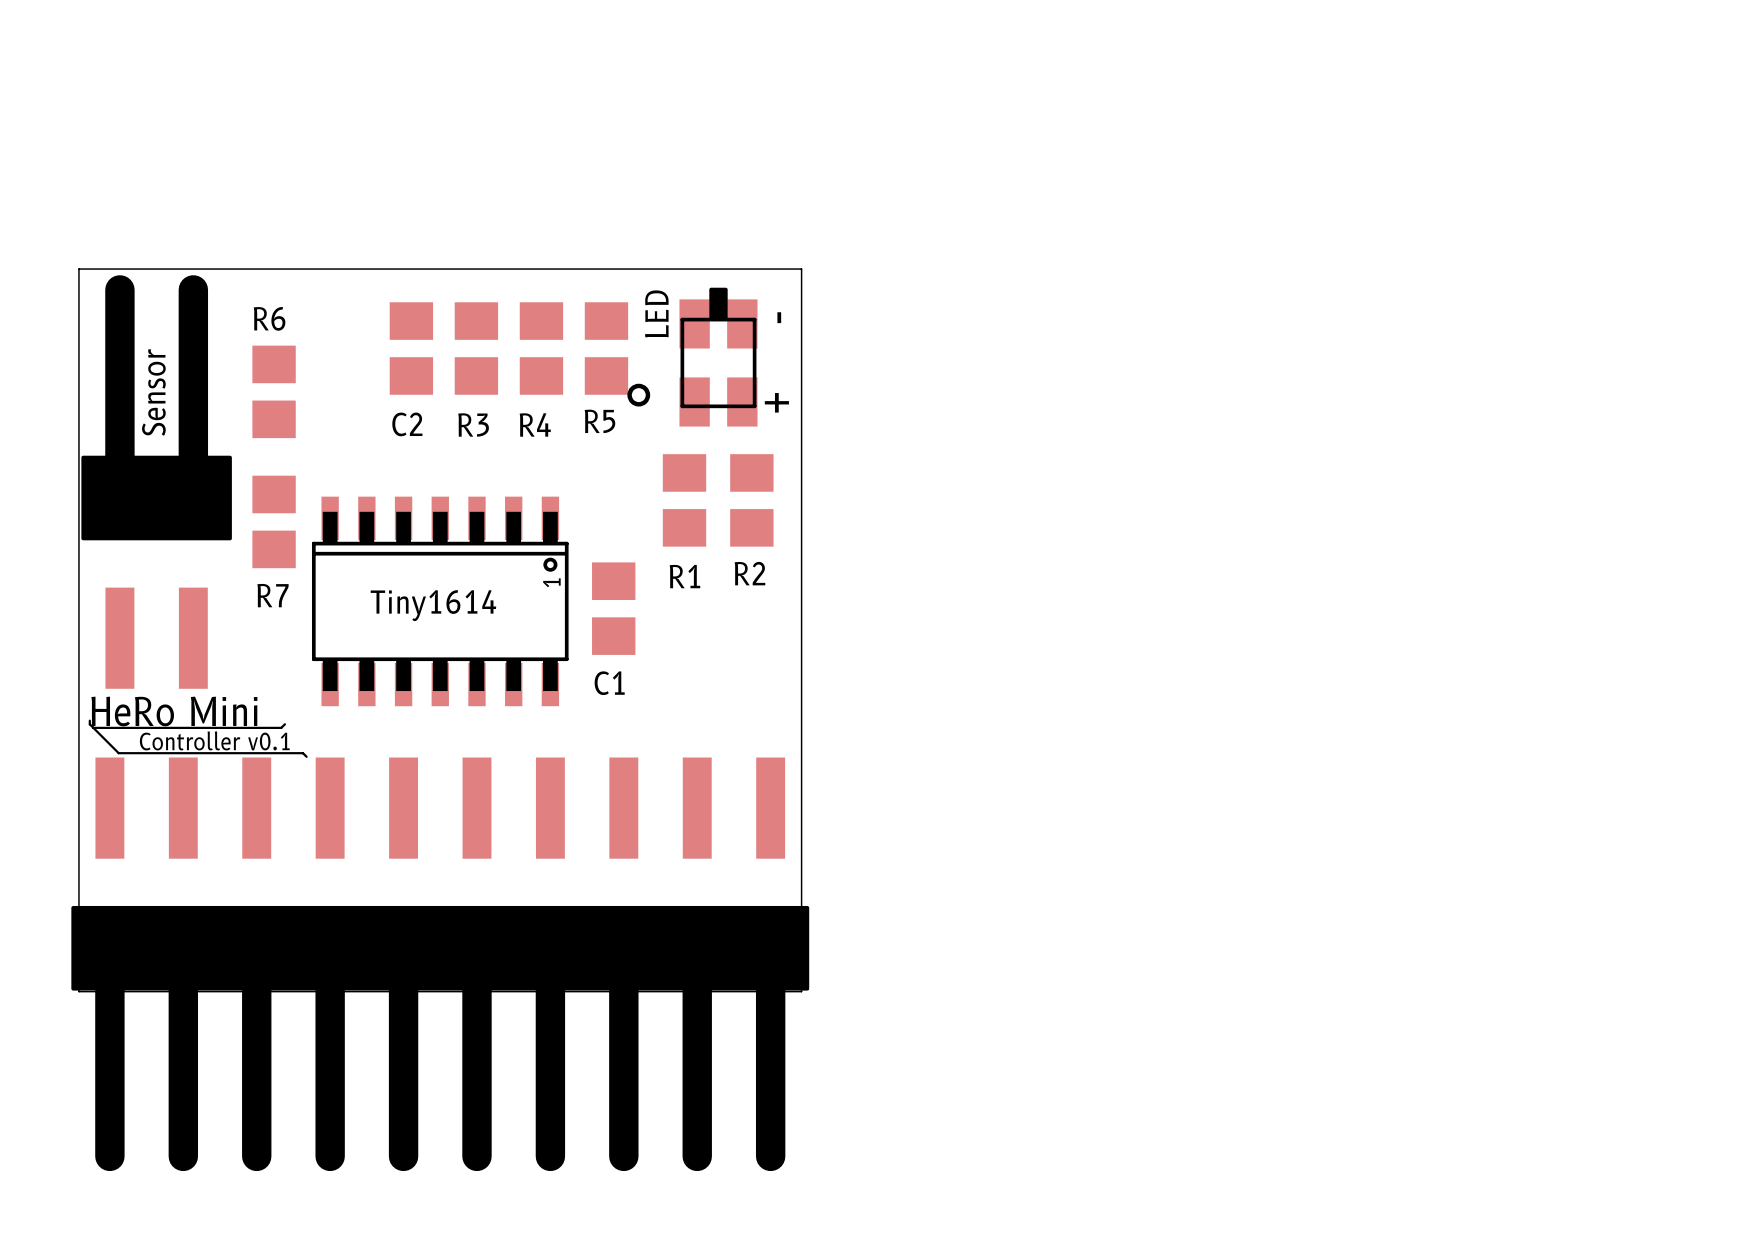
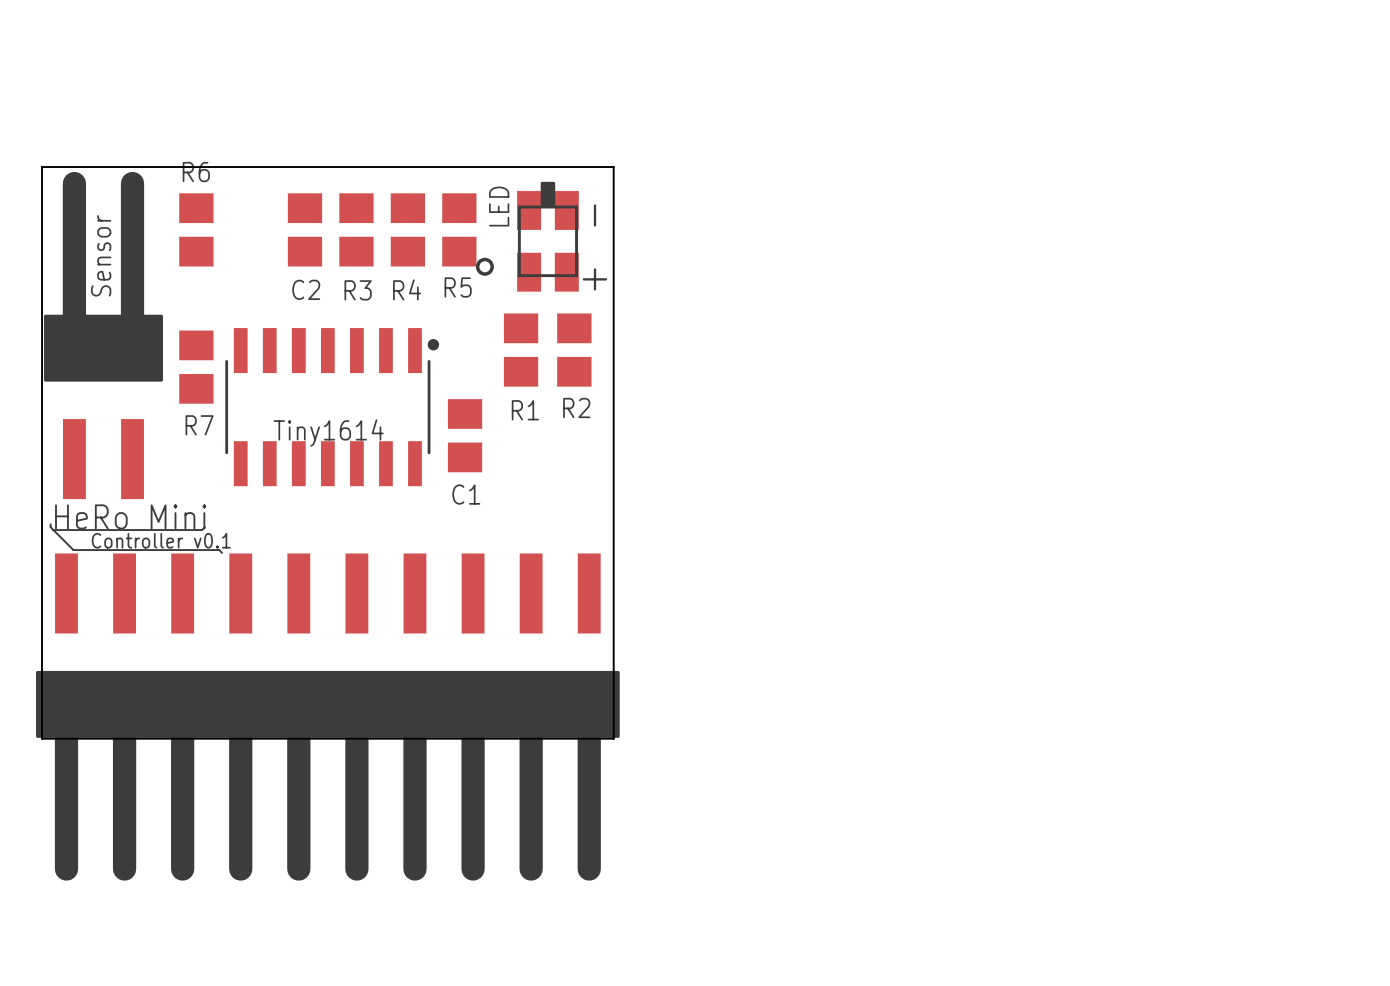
R6 position: (274, 391) -> (196, 229)
part: none -> (332, 407)
part: (440, 601) -> none

